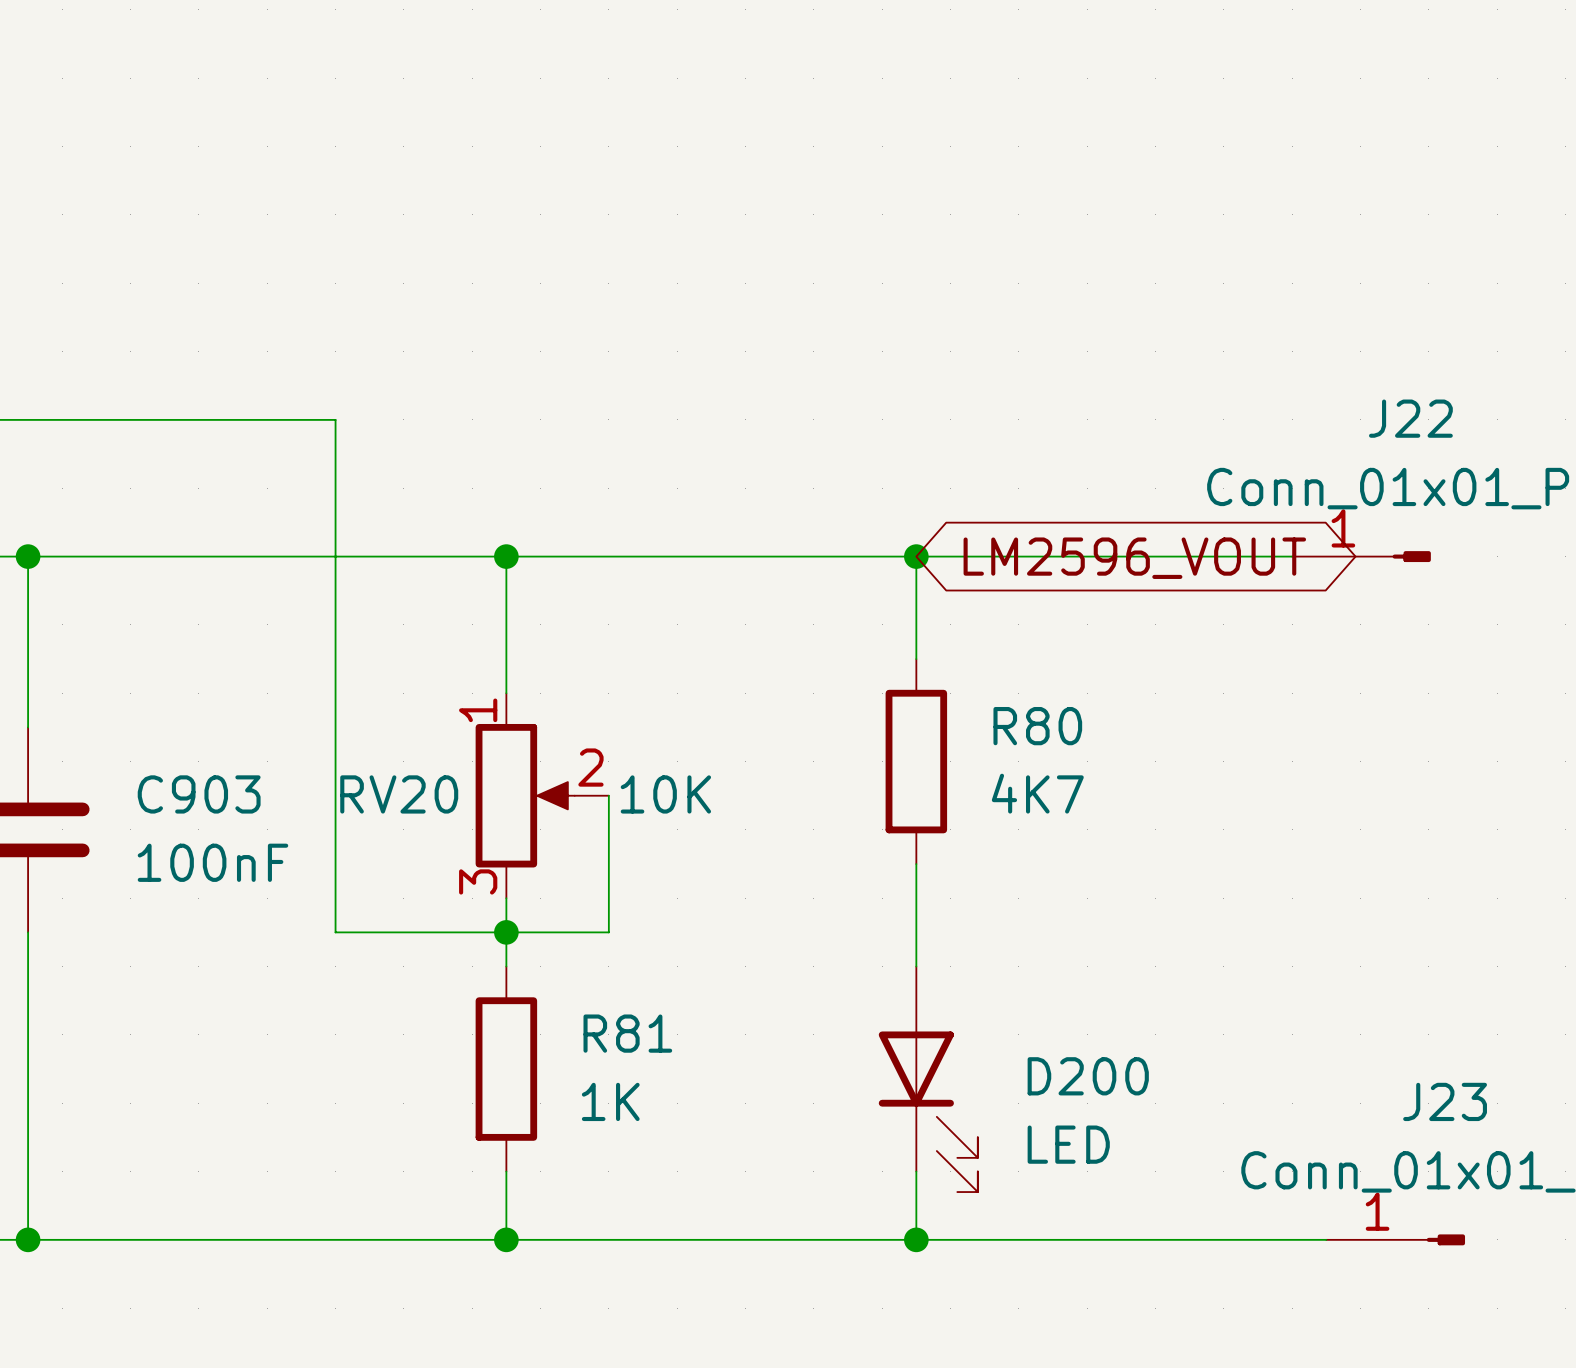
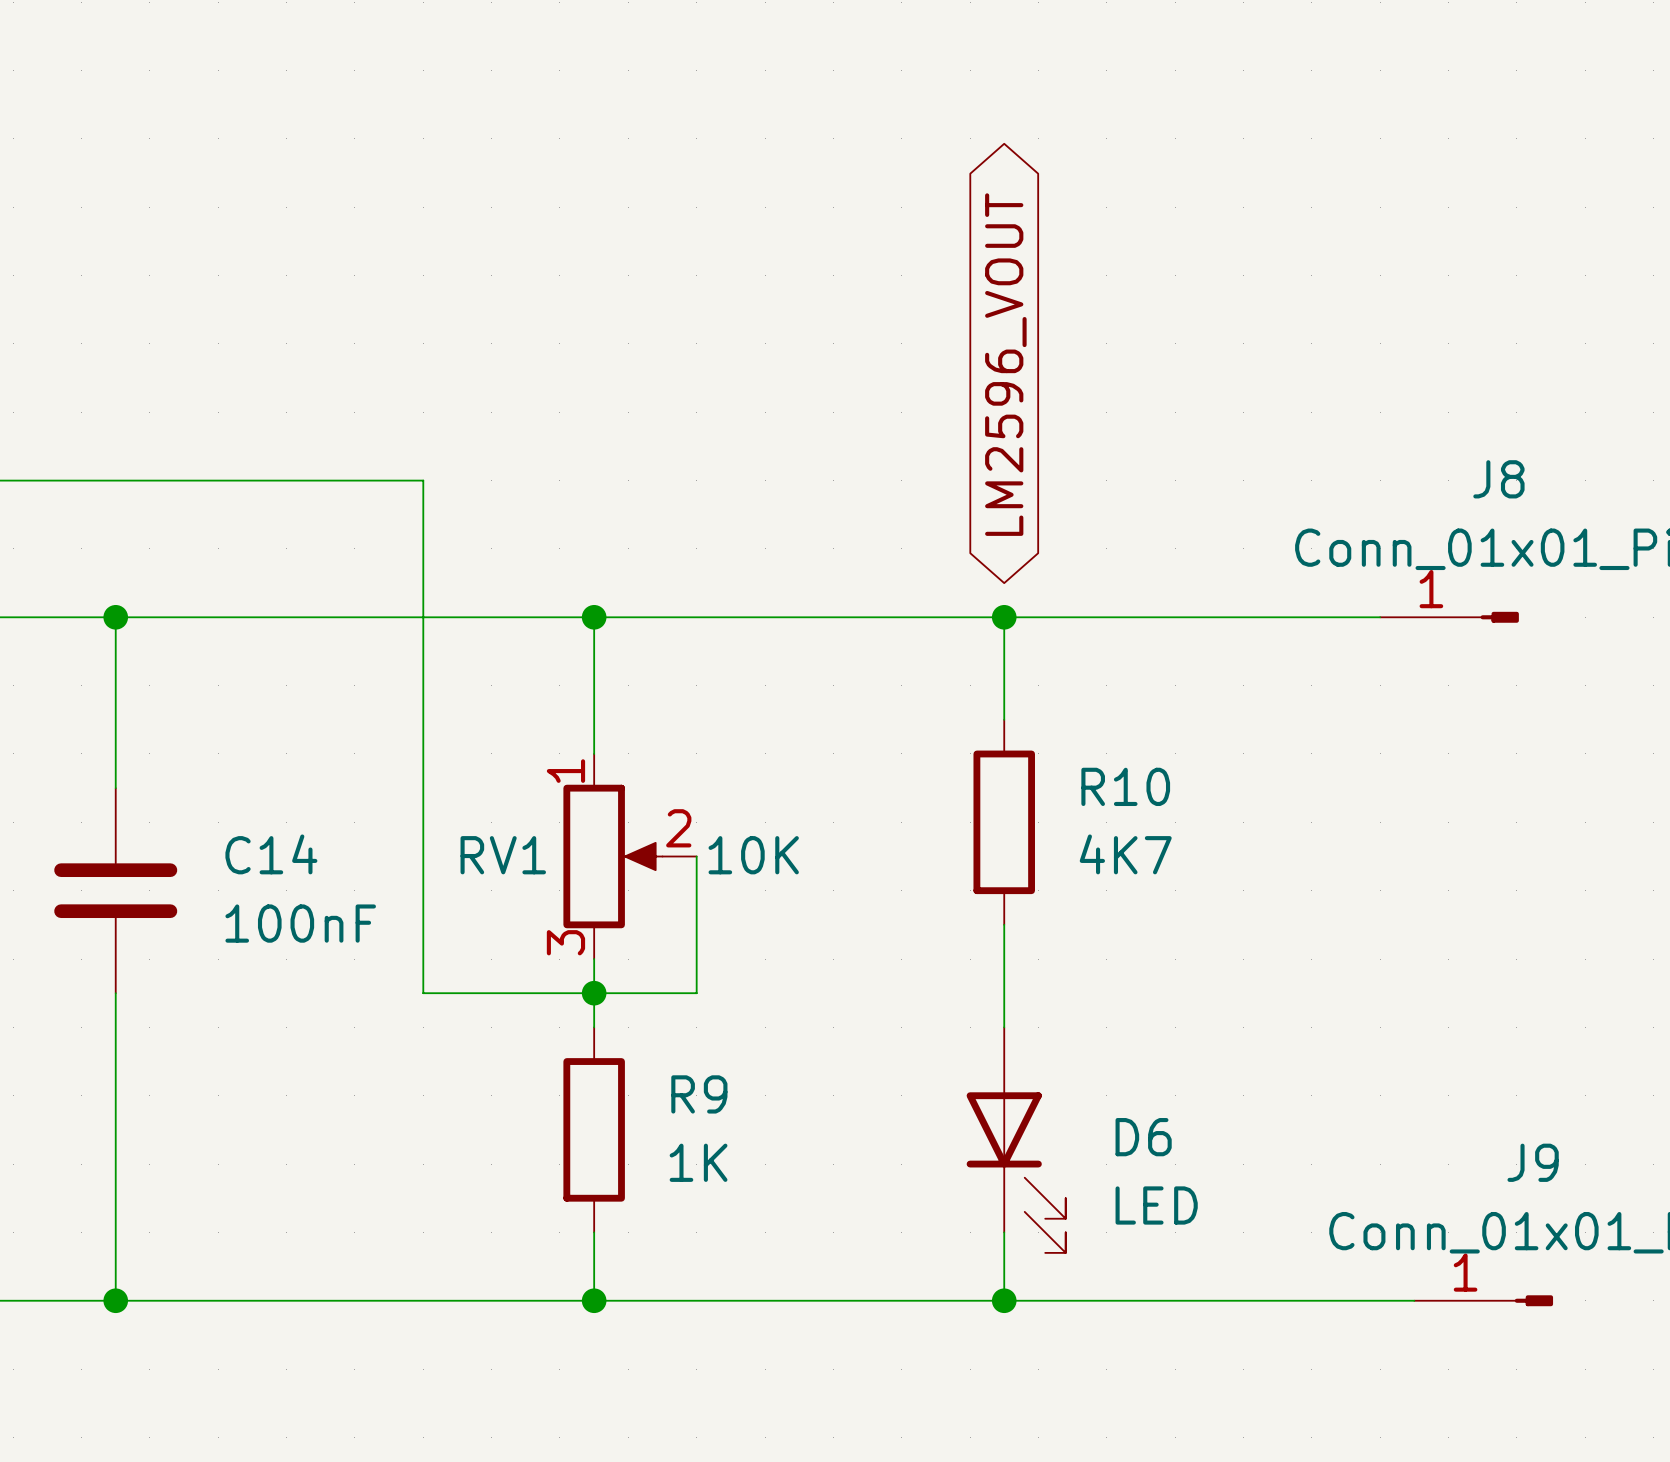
J22 name: J22 (1410, 418) -> J8 (1498, 479)
global label rotation: 0° (1134, 558) -> 90° counterclockwise (1005, 364)
R80 name: R80 (1037, 726) -> R10 (1125, 786)
C903 name: C903 (199, 794) -> C14 (271, 854)
RV20 name: RV20 (399, 794) -> RV1 (503, 855)
R81 name: R81 (627, 1033) -> R9 (699, 1094)
D200 name: D200 (1088, 1076) -> D6 (1143, 1137)
J23 name: J23 (1445, 1101) -> J9 (1533, 1162)

